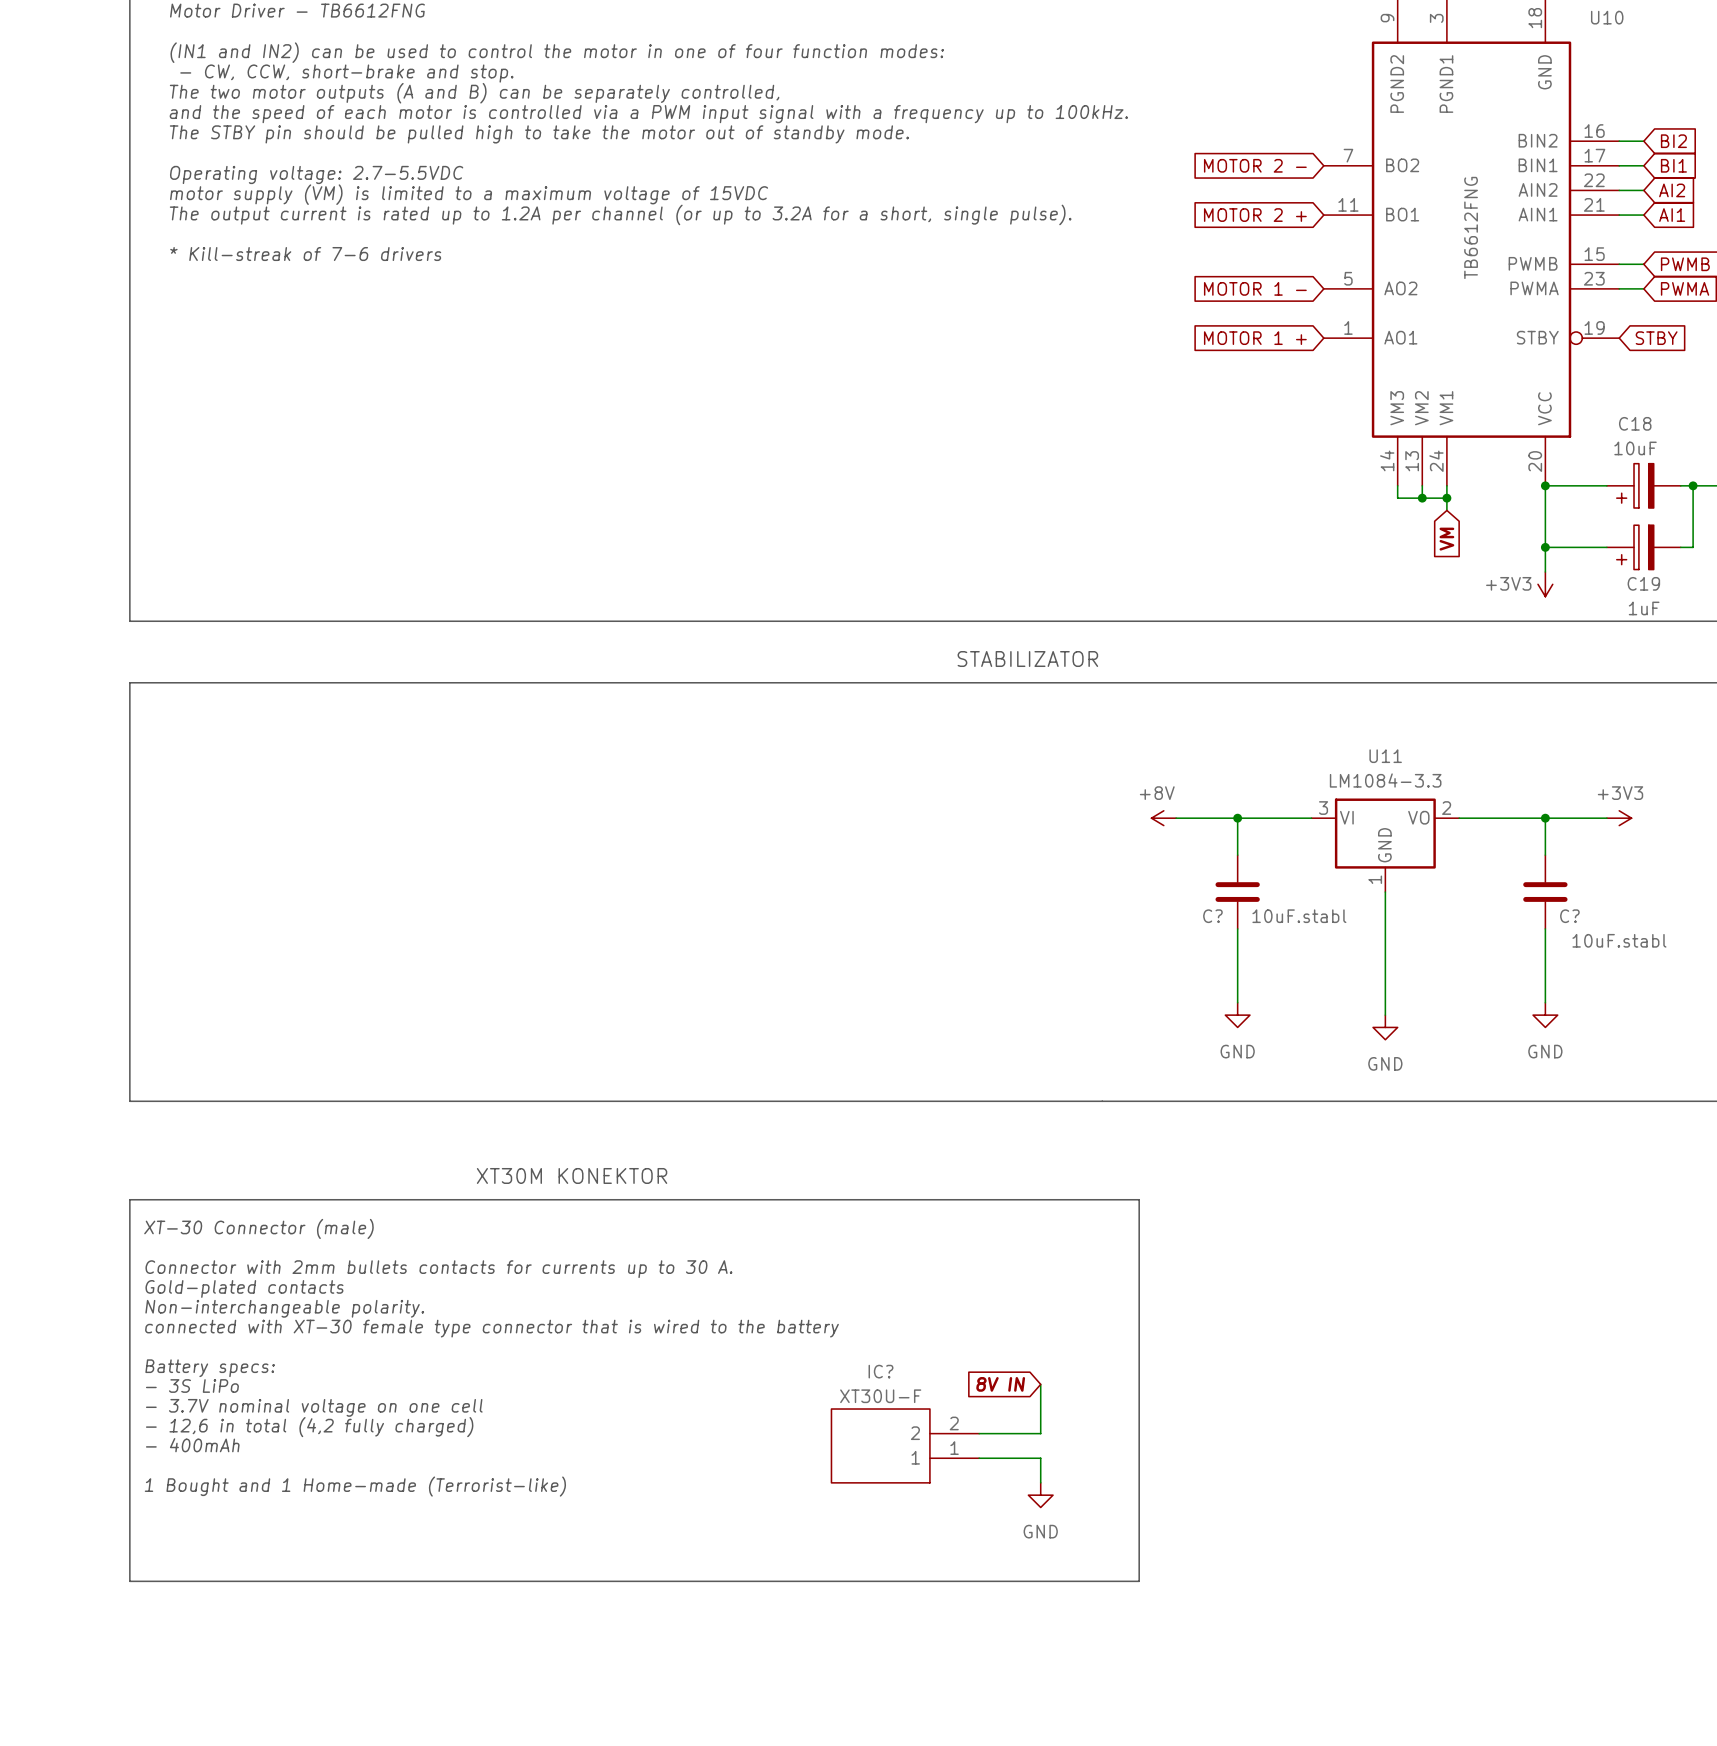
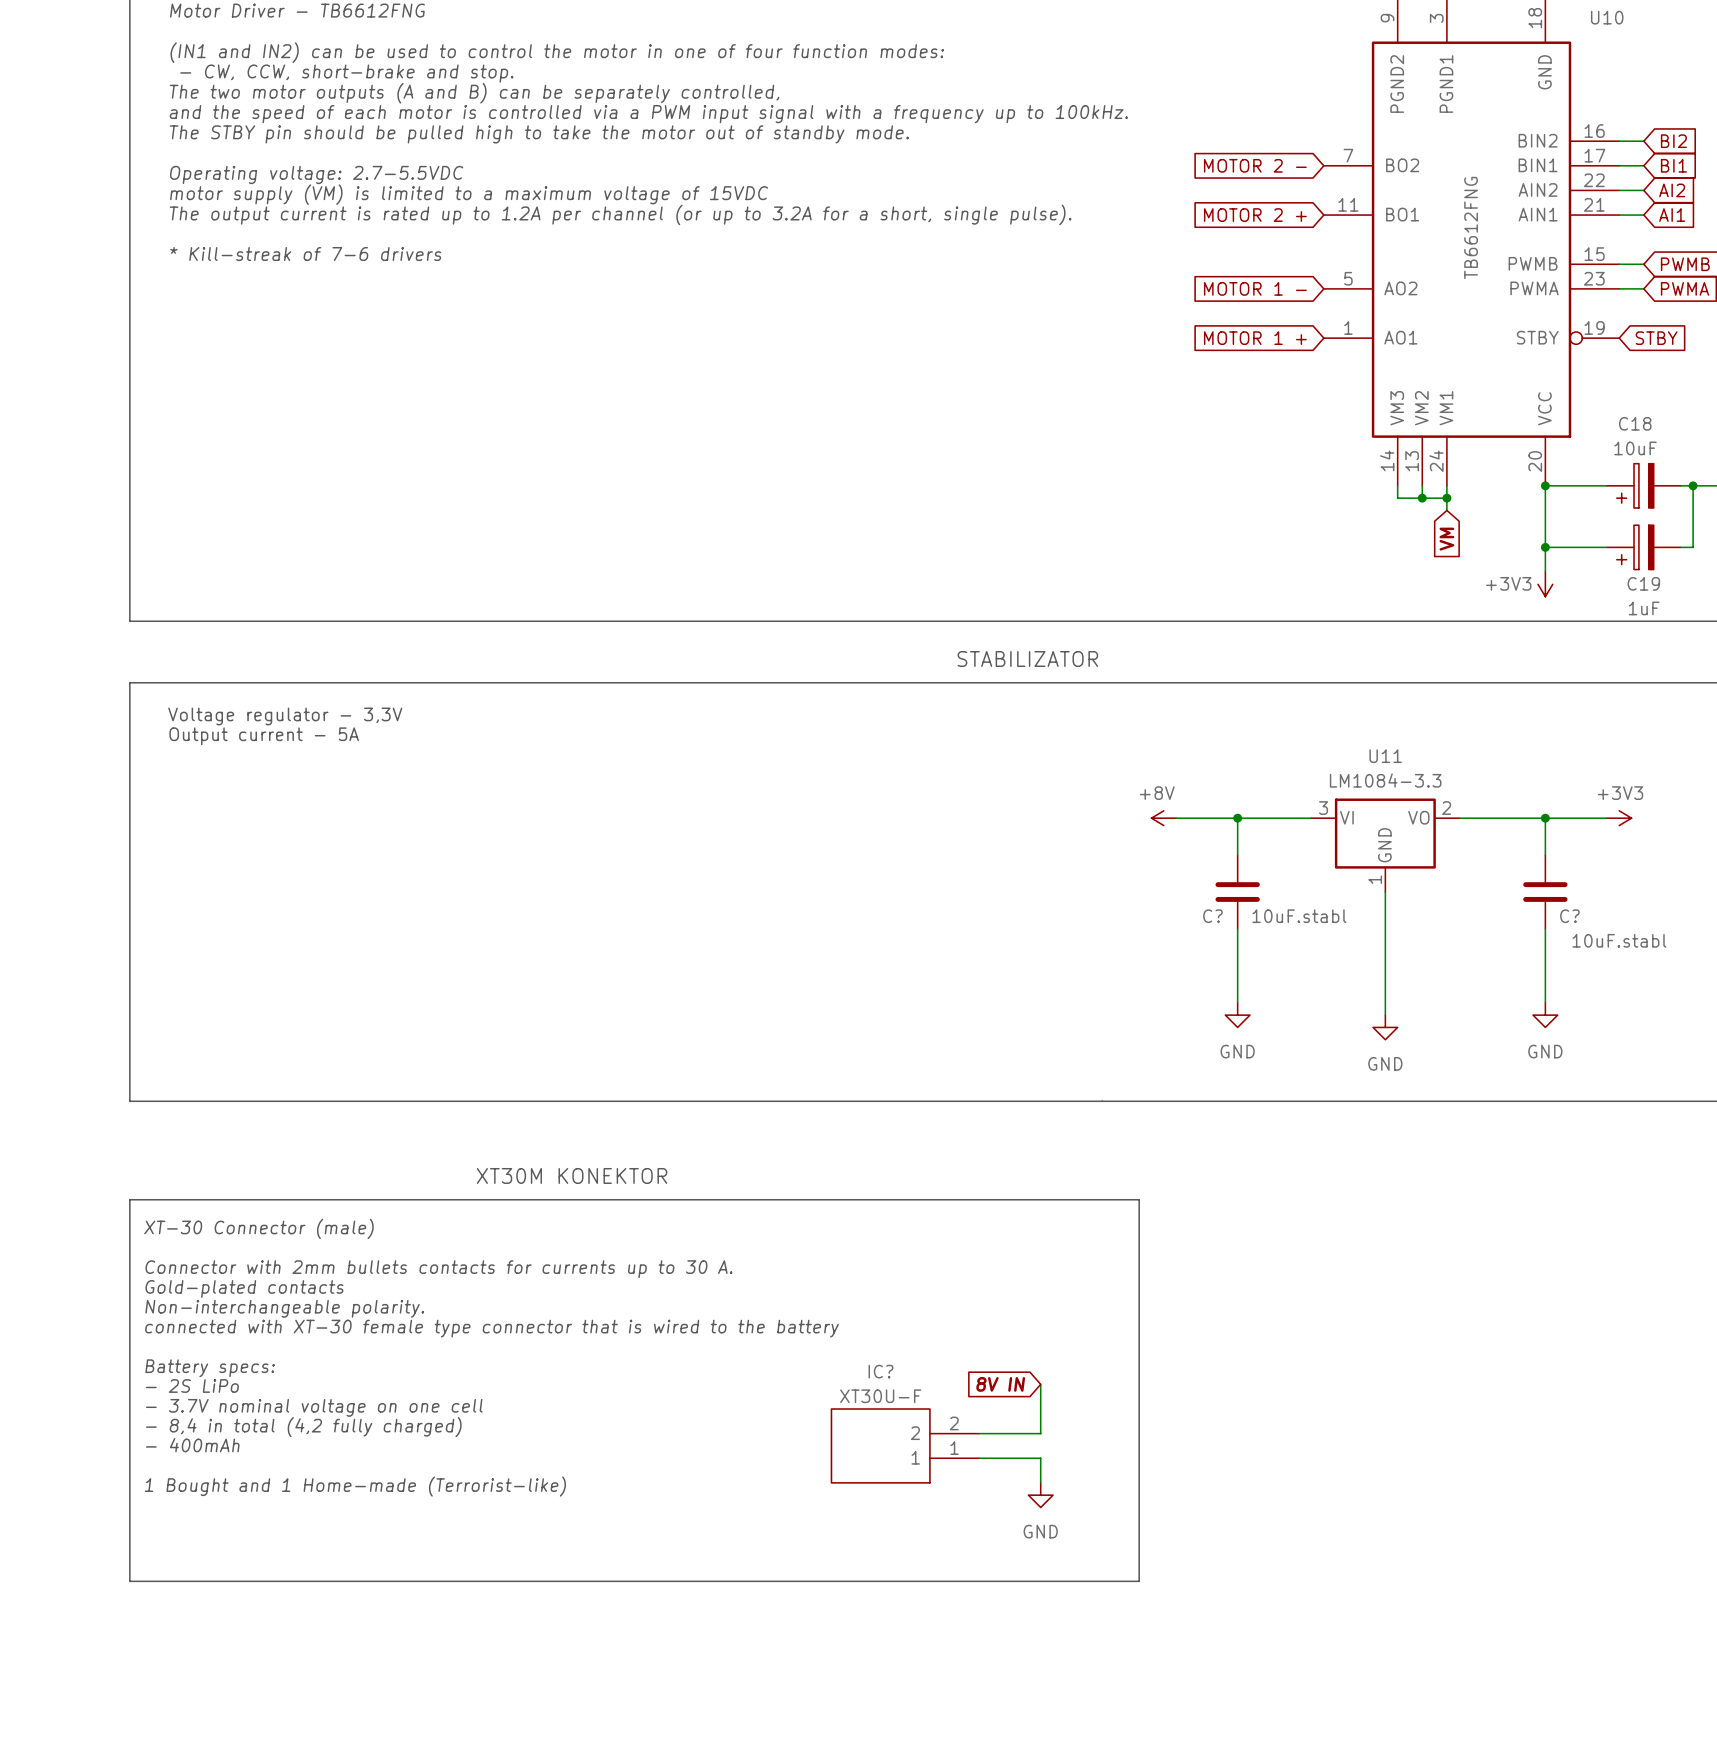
text: none -> Voltage regulator - 3,3V (285, 716)
text: none -> Output current - 5A (264, 736)
text: - 3S LiPo (192, 1386) -> - 2S LiPo (192, 1386)
text: - 12,6 in total (4,2 fully charged) (309, 1427) -> - 8,4 in total (4,2 fully charged) (303, 1427)

